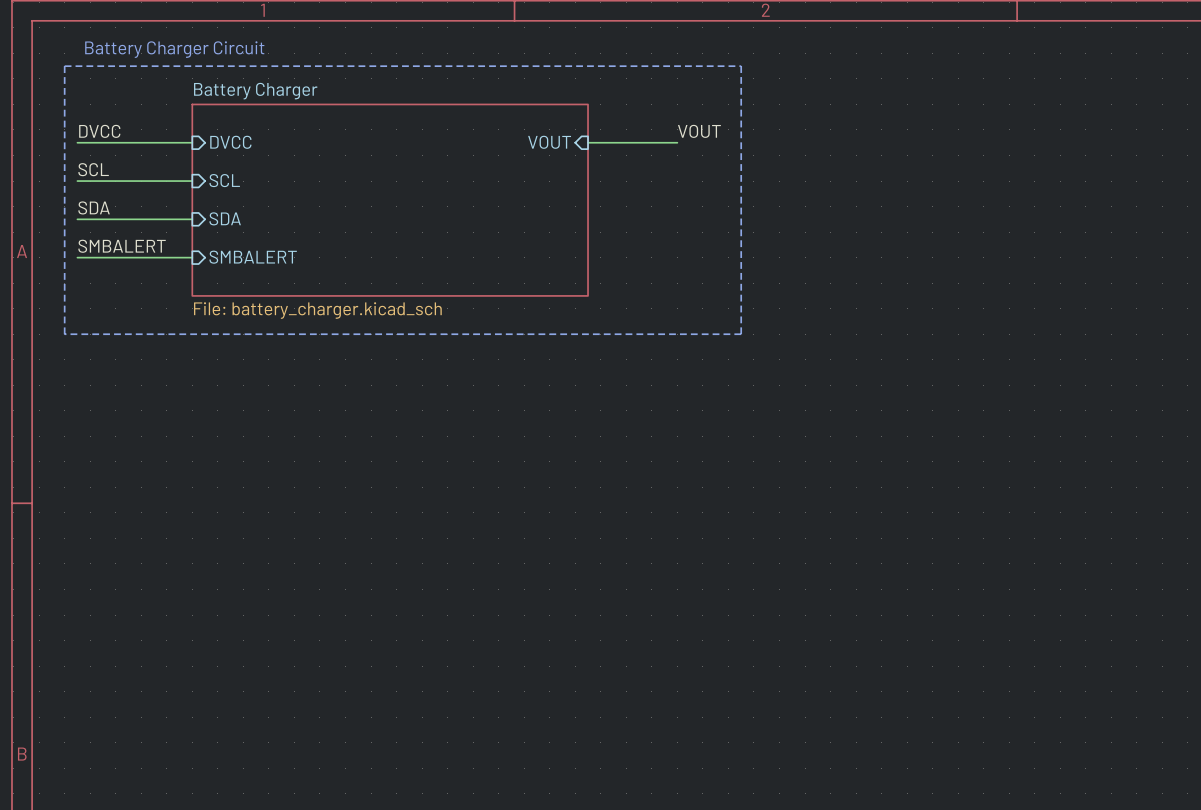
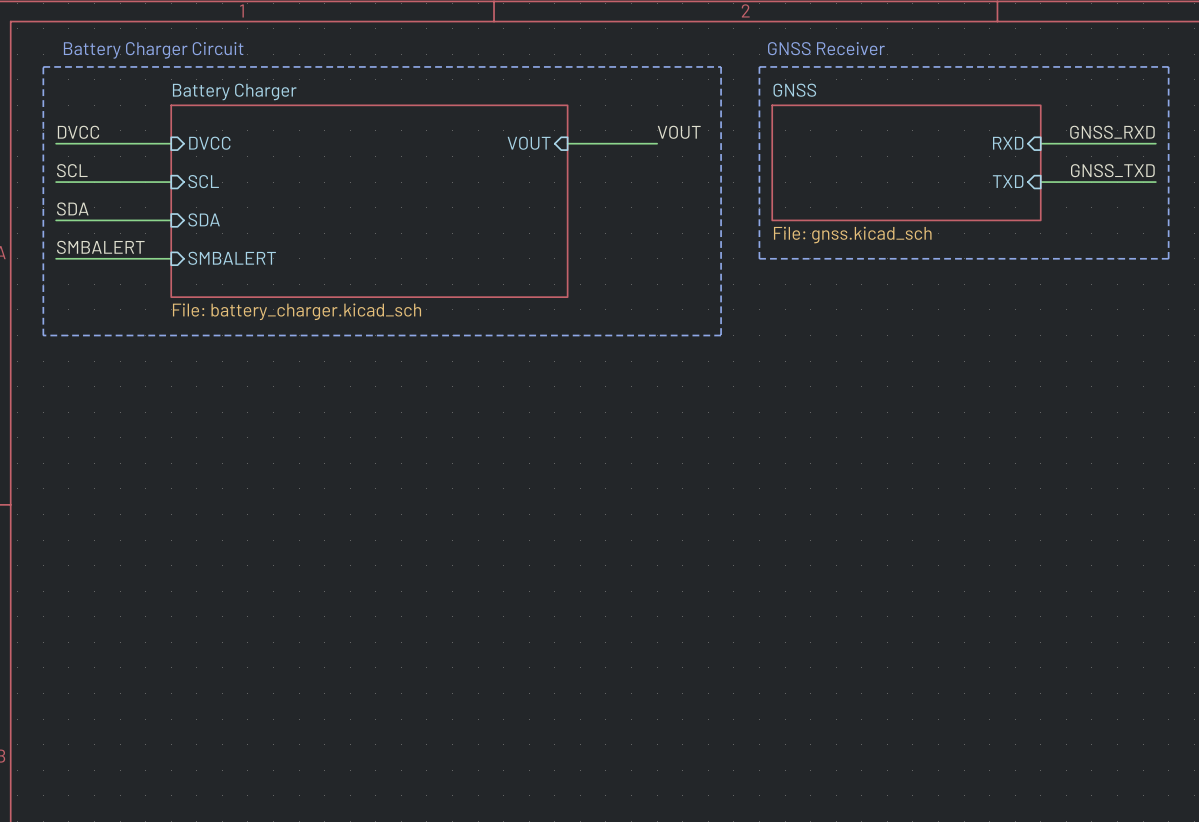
text: none -> GNSS Receiver (826, 48)
line: none -> (759, 66) (1168, 66) (1168, 258) (759, 258) (759, 66)
label: none -> GNSS_RXD (1112, 132)
sheet pin: none -> RXD (1008, 143)
wire: none -> (1040, 143) (1155, 143)
sheet GNSS: none -> File: gnss.kicad_sch (906, 162)
label: none -> GNSS_TXD (1112, 170)
sheet pin: none -> TXD (1008, 181)
wire: none -> (1040, 182) (1155, 182)

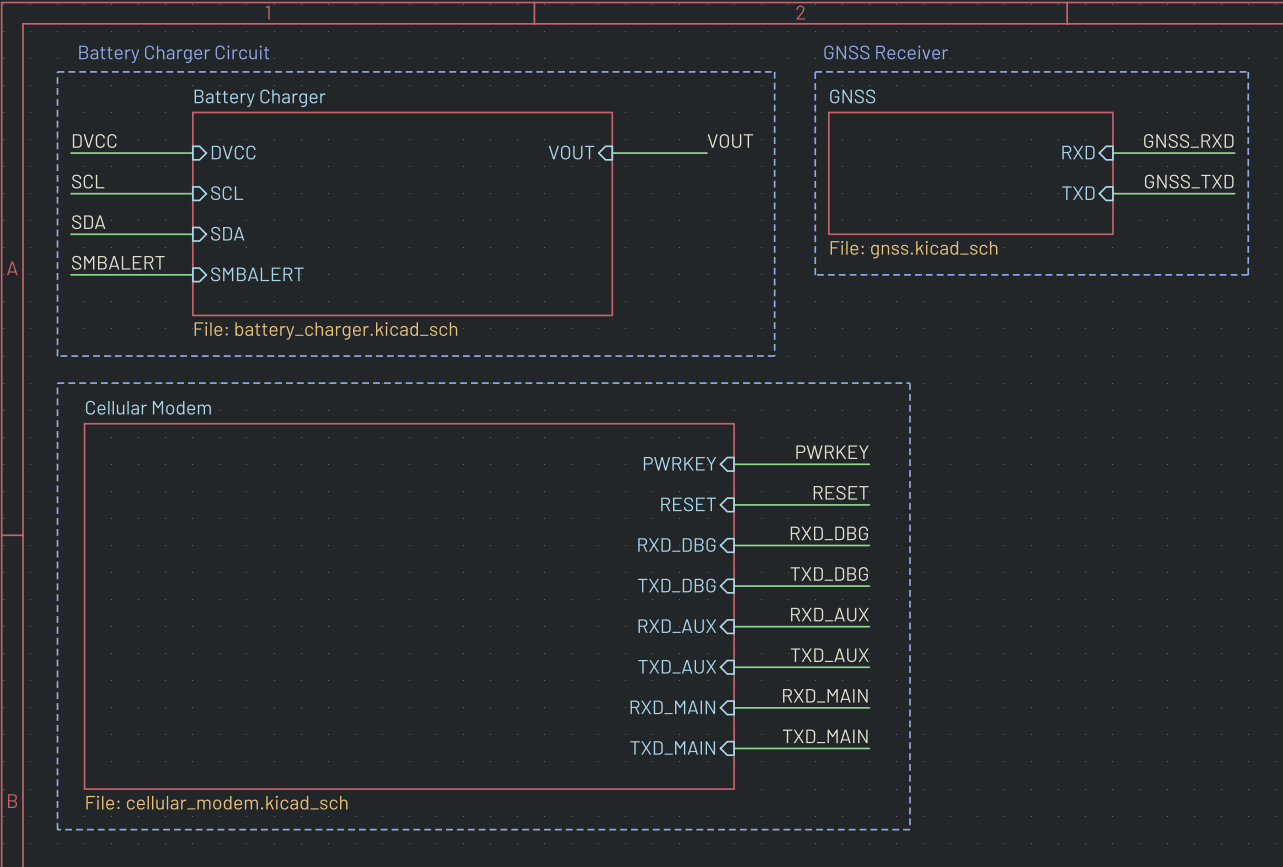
line: none -> (57, 383) (909, 383) (909, 829) (57, 829) (57, 383)
label: none -> PWRKEY (832, 452)
sheet pin: none -> PWRKEY (680, 463)
wire: none -> (734, 464) (869, 464)
label: none -> RESET (841, 492)
sheet pin: none -> RESET (688, 504)
wire: none -> (734, 504) (869, 504)
label: none -> RXD_DBG (829, 533)
sheet pin: none -> RXD_DBG (676, 544)
wire: none -> (734, 545) (869, 545)
label: none -> TXD_DBG (829, 574)
sheet pin: none -> TXD_DBG (676, 585)
wire: none -> (734, 586) (869, 586)
sheet Cellular Modem: none -> File: cellular_modem.kicad_sch (409, 606)
label: none -> RXD_AUX (829, 614)
sheet pin: none -> RXD_AUX (677, 626)
wire: none -> (734, 626) (869, 626)
label: none -> TXD_AUX (829, 655)
sheet pin: none -> TXD_AUX (677, 666)
wire: none -> (734, 667) (869, 667)
label: none -> RXD_MAIN (825, 695)
sheet pin: none -> RXD_MAIN (672, 707)
wire: none -> (734, 707) (869, 707)
label: none -> TXD_MAIN (825, 736)
sheet pin: none -> TXD_MAIN (672, 747)
wire: none -> (734, 748) (869, 748)

